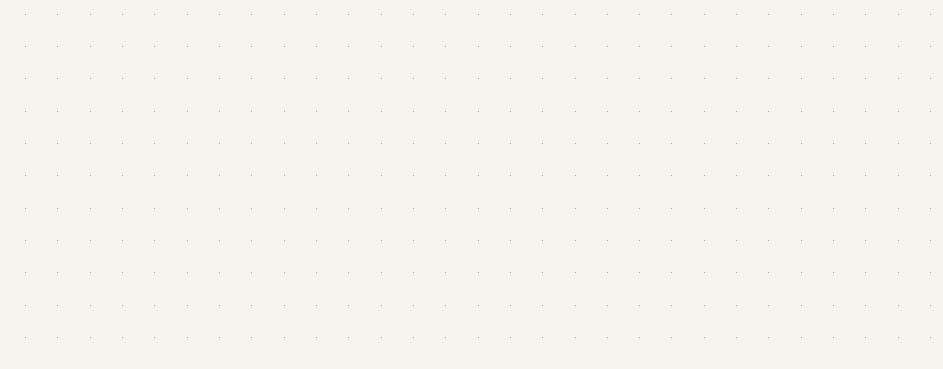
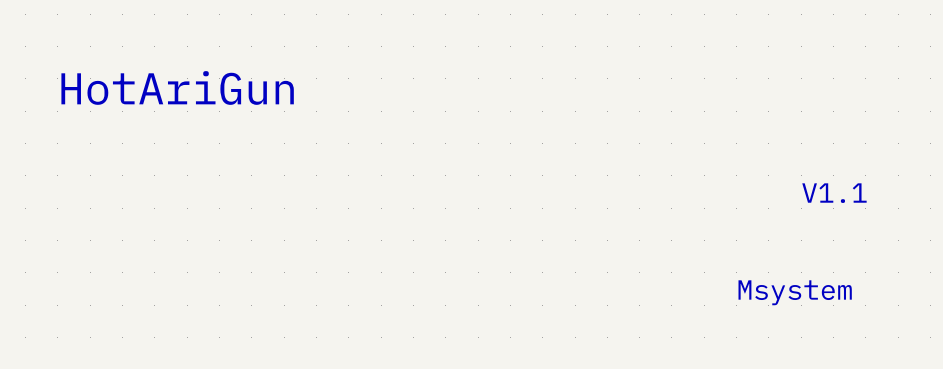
text: none -> HotAriGun (177, 87)
text: none -> V1.1 (834, 193)
text: none -> Msystem (795, 292)

